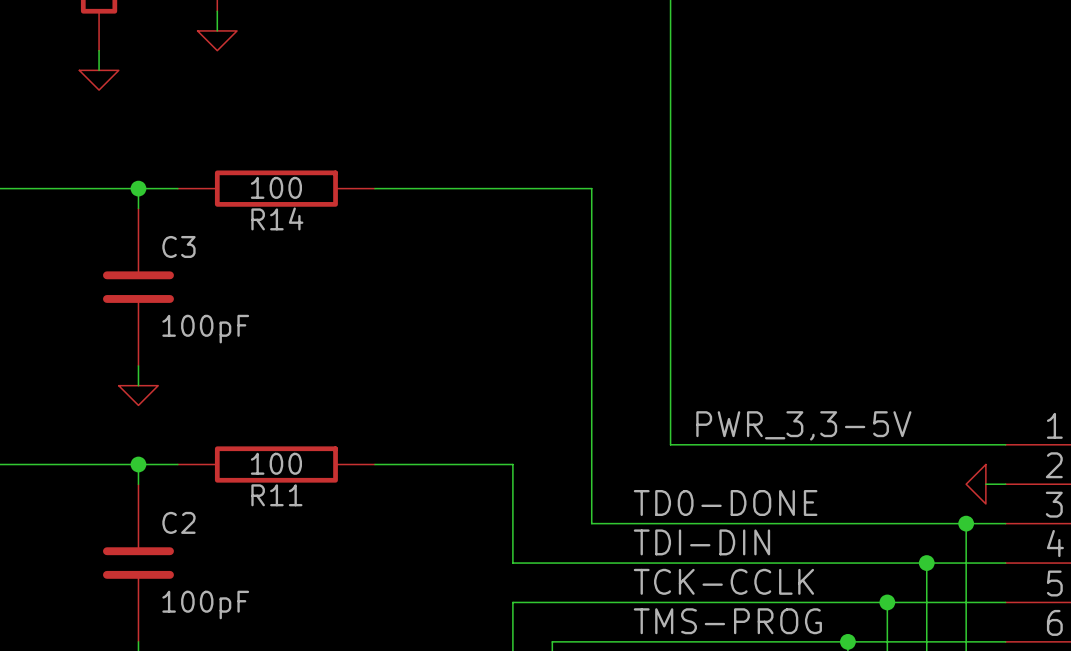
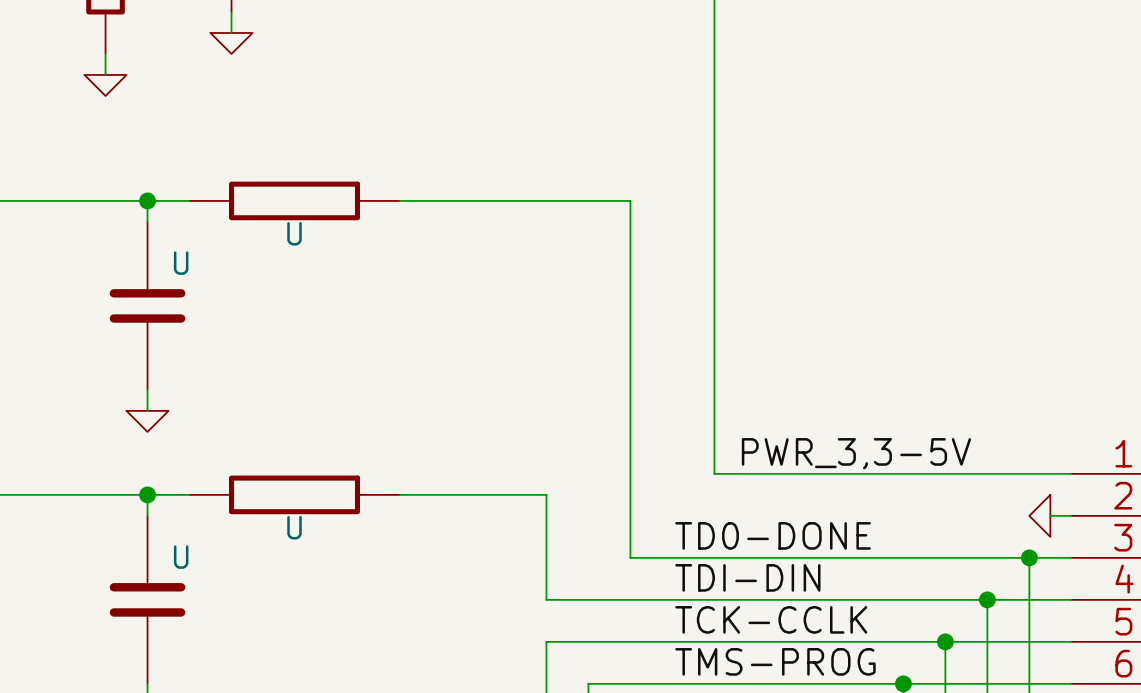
R14 value: 100 (276, 187) -> none
R14 name: R14 (277, 218) -> U (294, 233)
C3 name: C3 (178, 246) -> U (181, 263)
C3 value: 100pF (205, 329) -> none
R11 value: 100 (276, 463) -> none
R11 name: R11 (276, 495) -> U (294, 527)
C2 name: C2 (178, 522) -> U (181, 557)
C2 value: 100pF (205, 605) -> none

